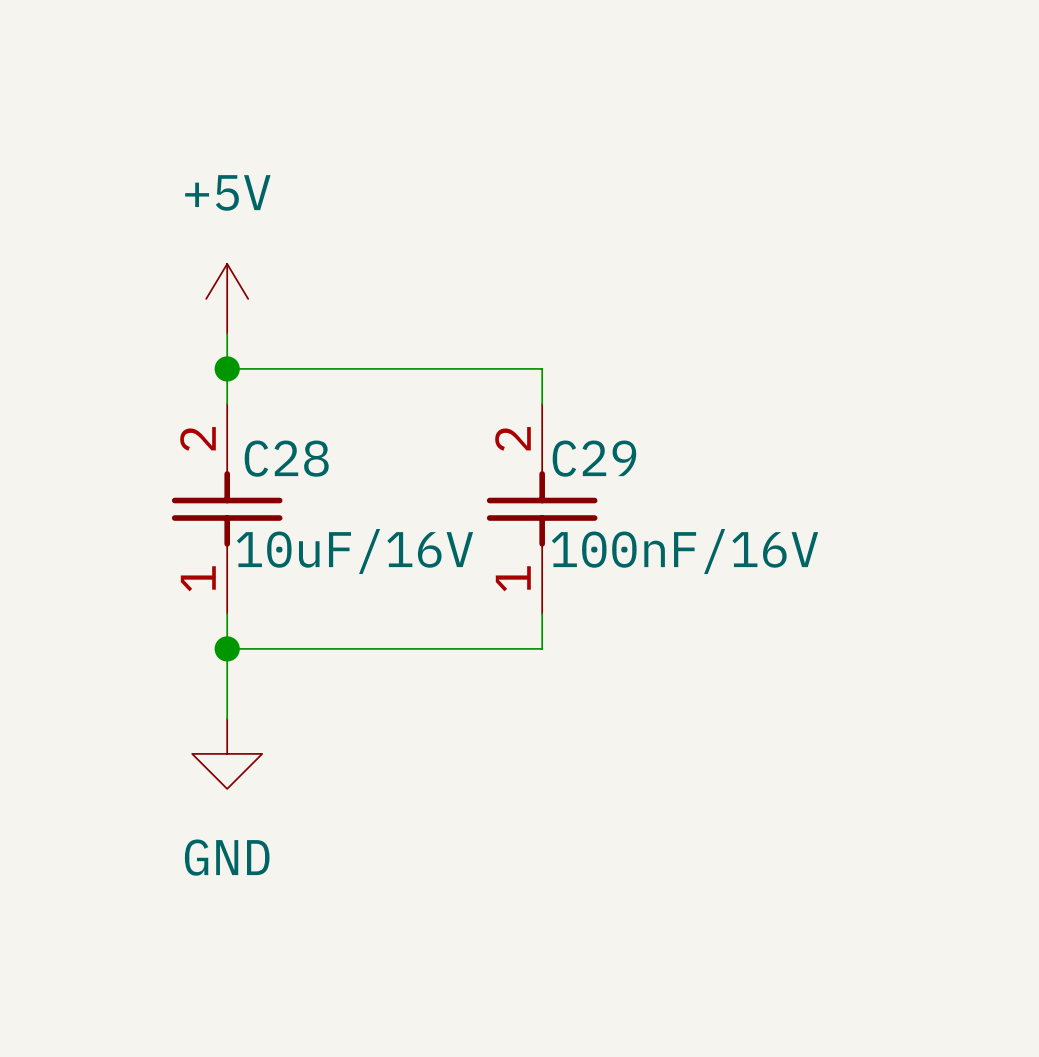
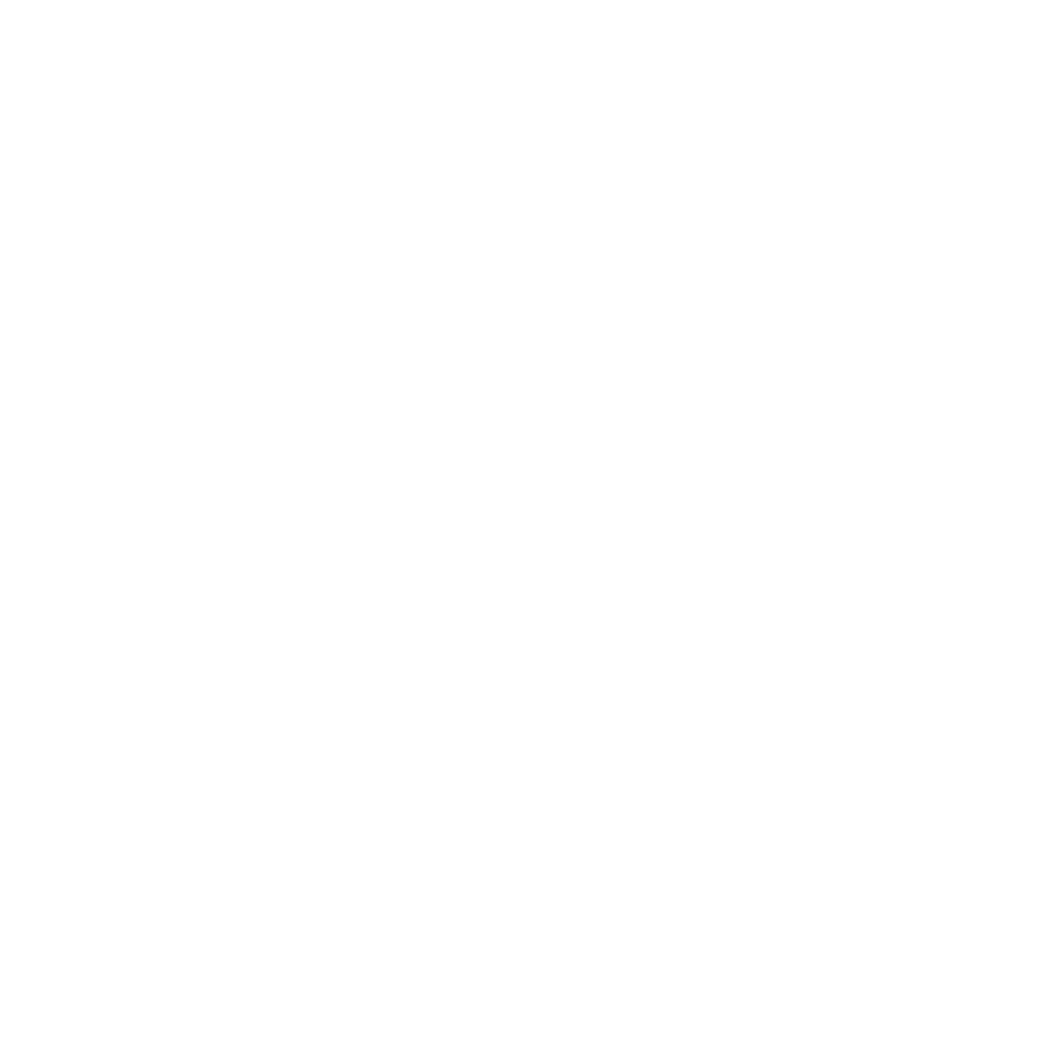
power symbol: +5V (227, 298) -> none
wire: (227, 333) (227, 403) -> none
wire: (227, 368) (542, 368) (542, 403) -> none
junction: (227, 368) -> none
C28: 10uF/16V (227, 508) -> none
C29: 100nF/16V (542, 508) -> none
wire: (227, 613) (227, 718) -> none
wire: (542, 613) (542, 648) (227, 648) -> none
junction: (227, 648) -> none
power symbol: GND (227, 753) -> none

